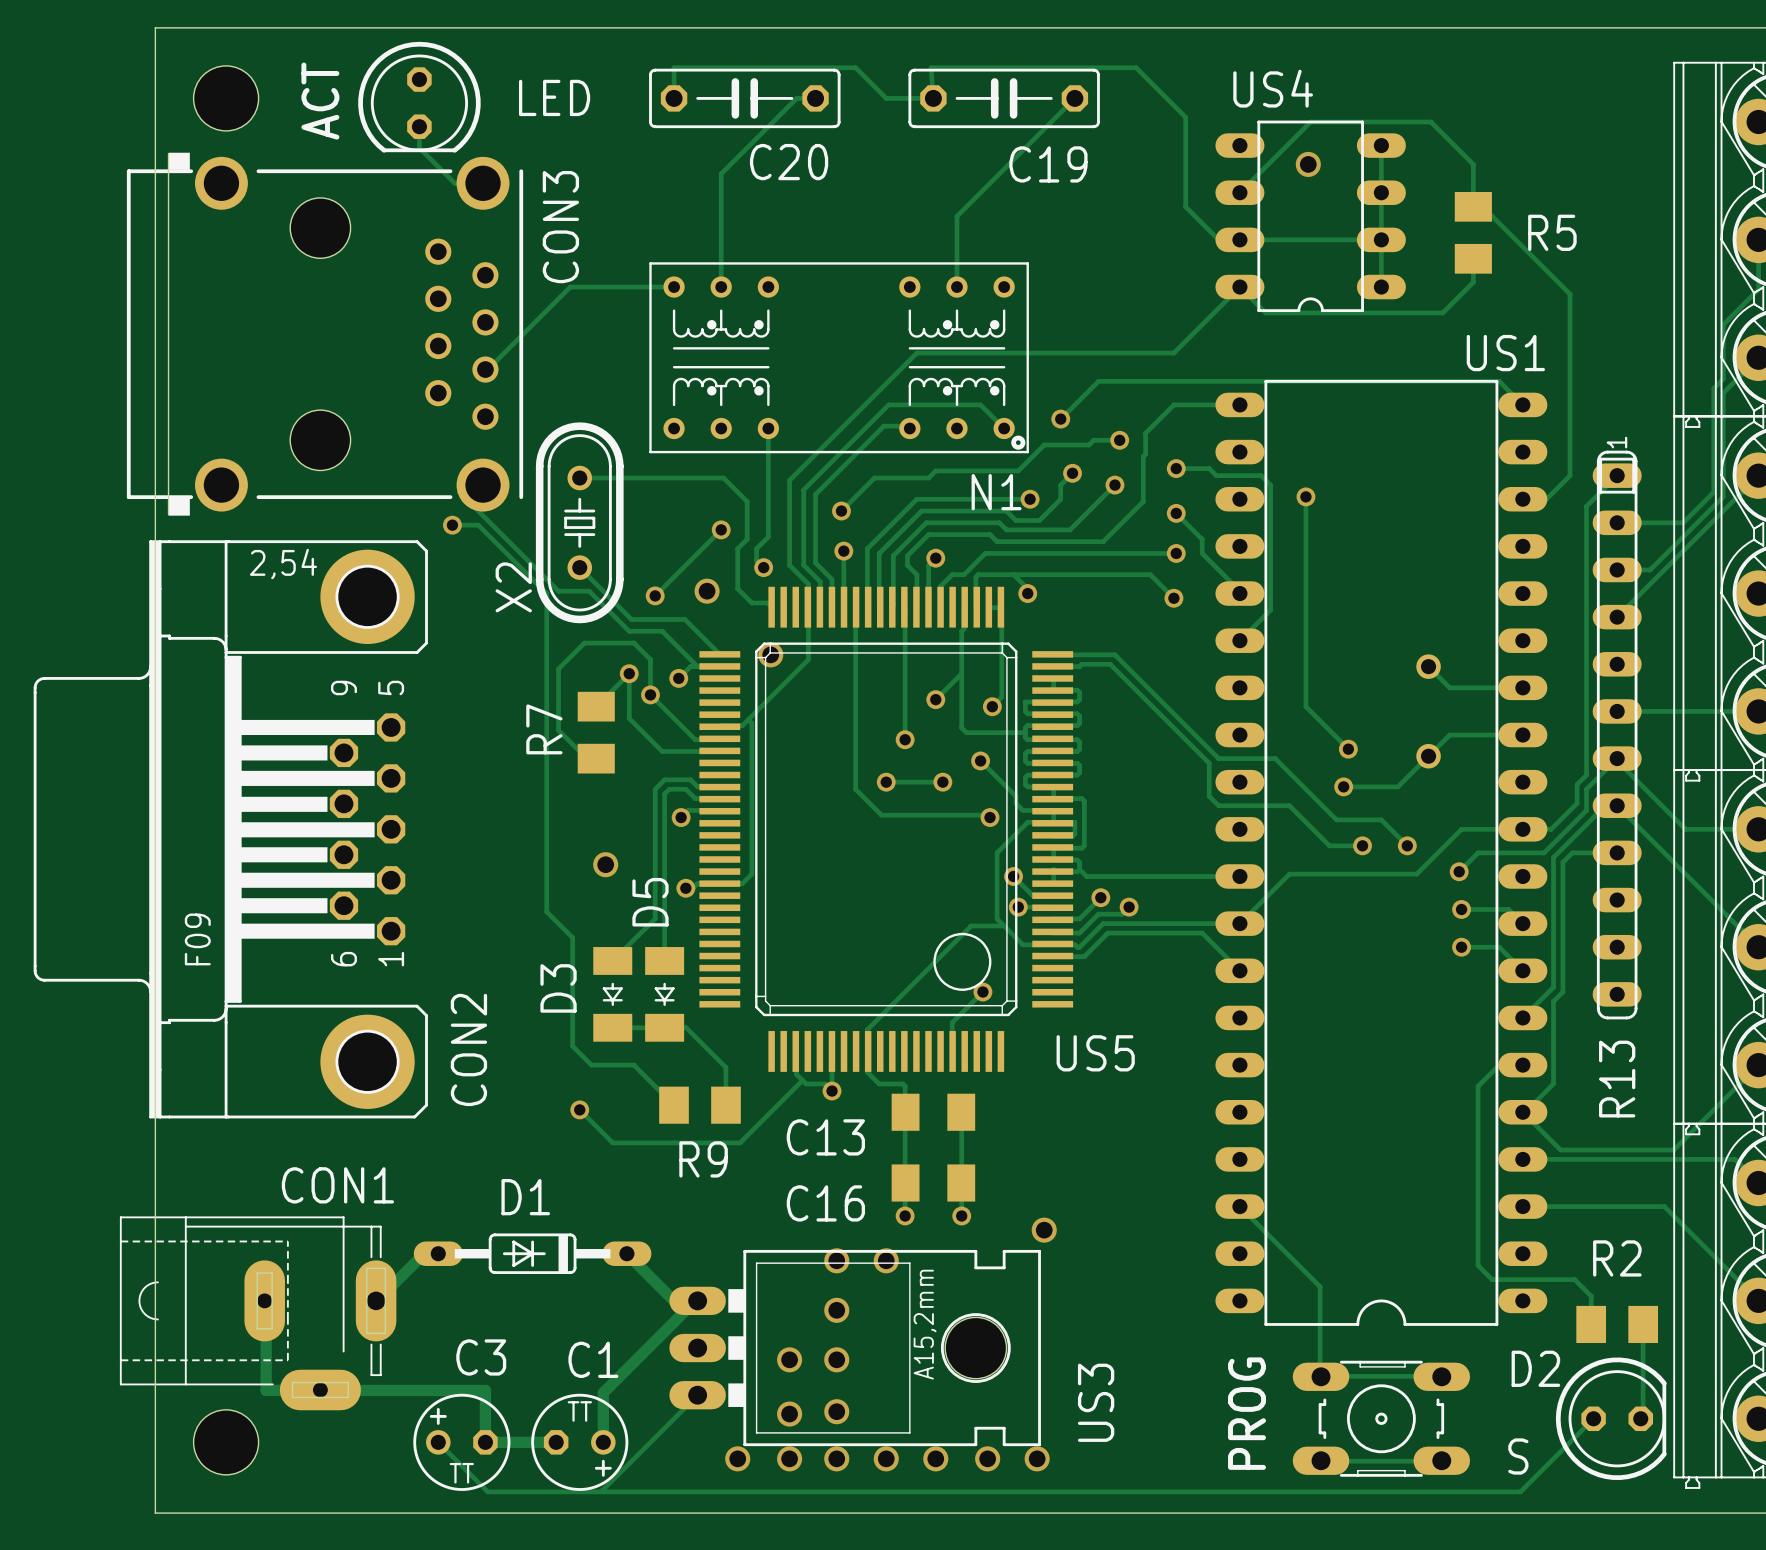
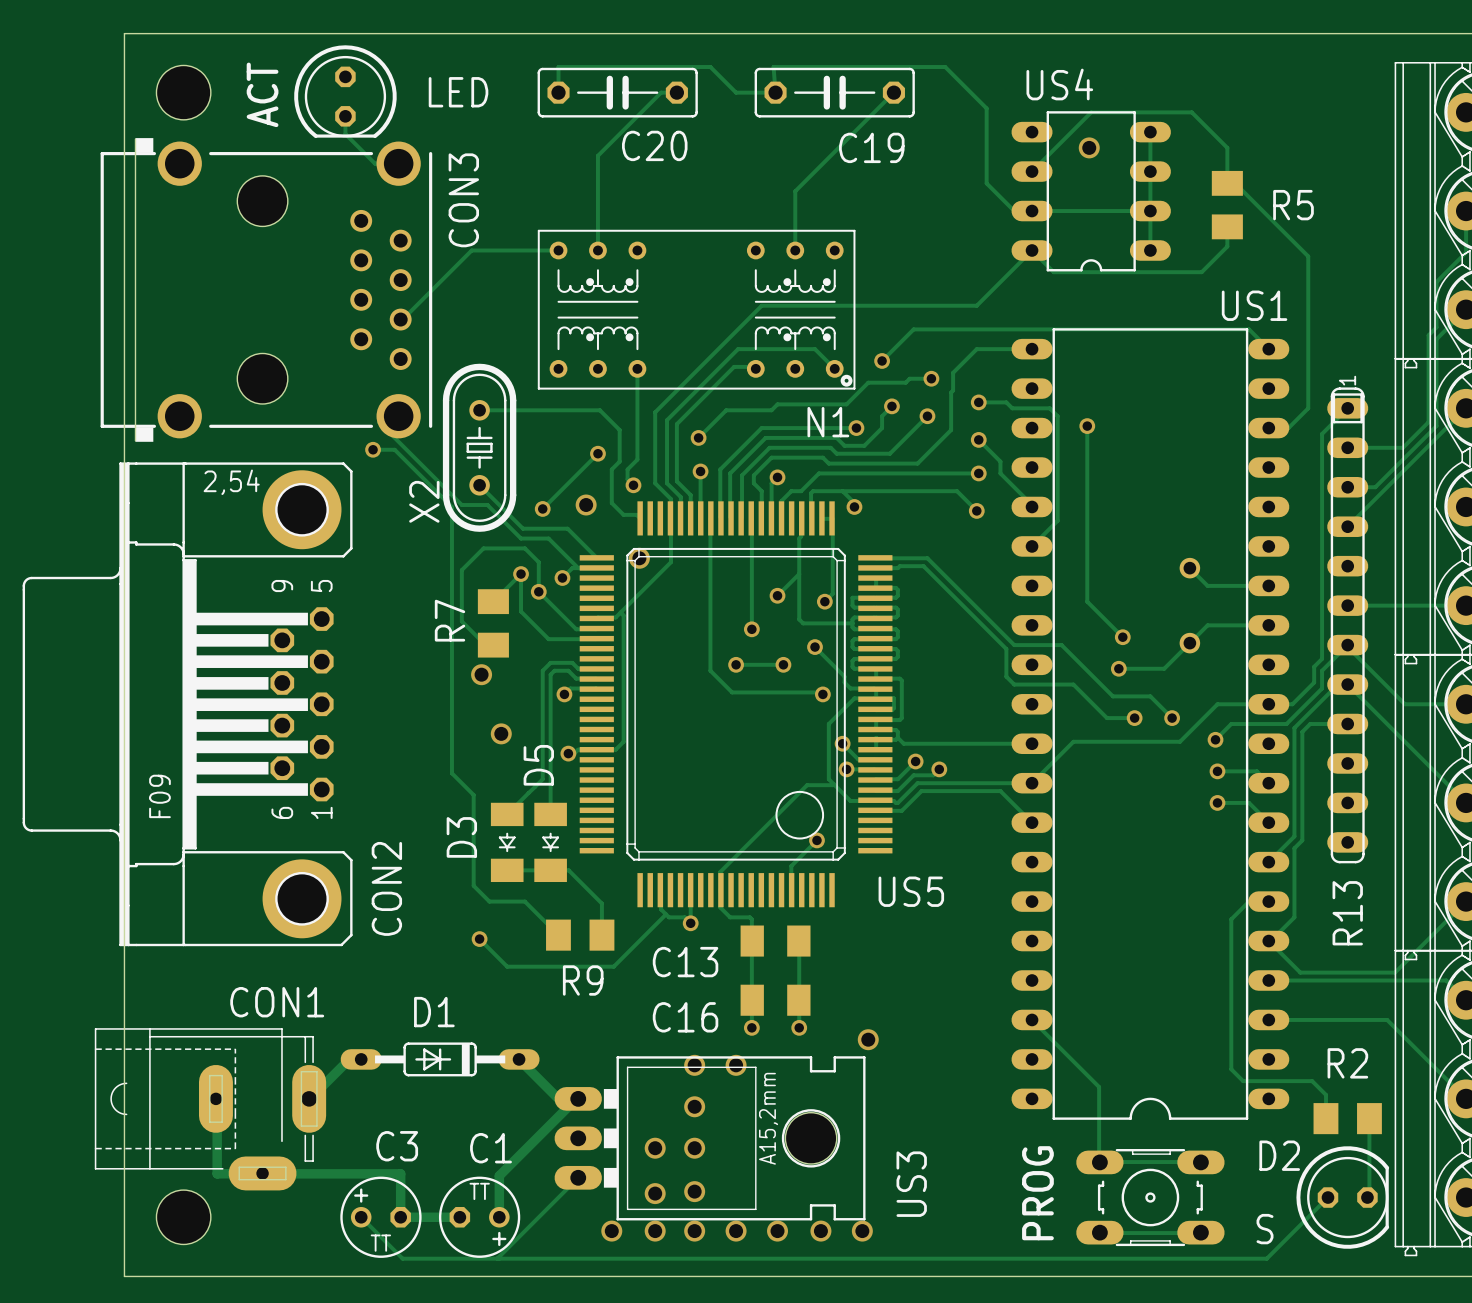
via: none -> (481, 674)

